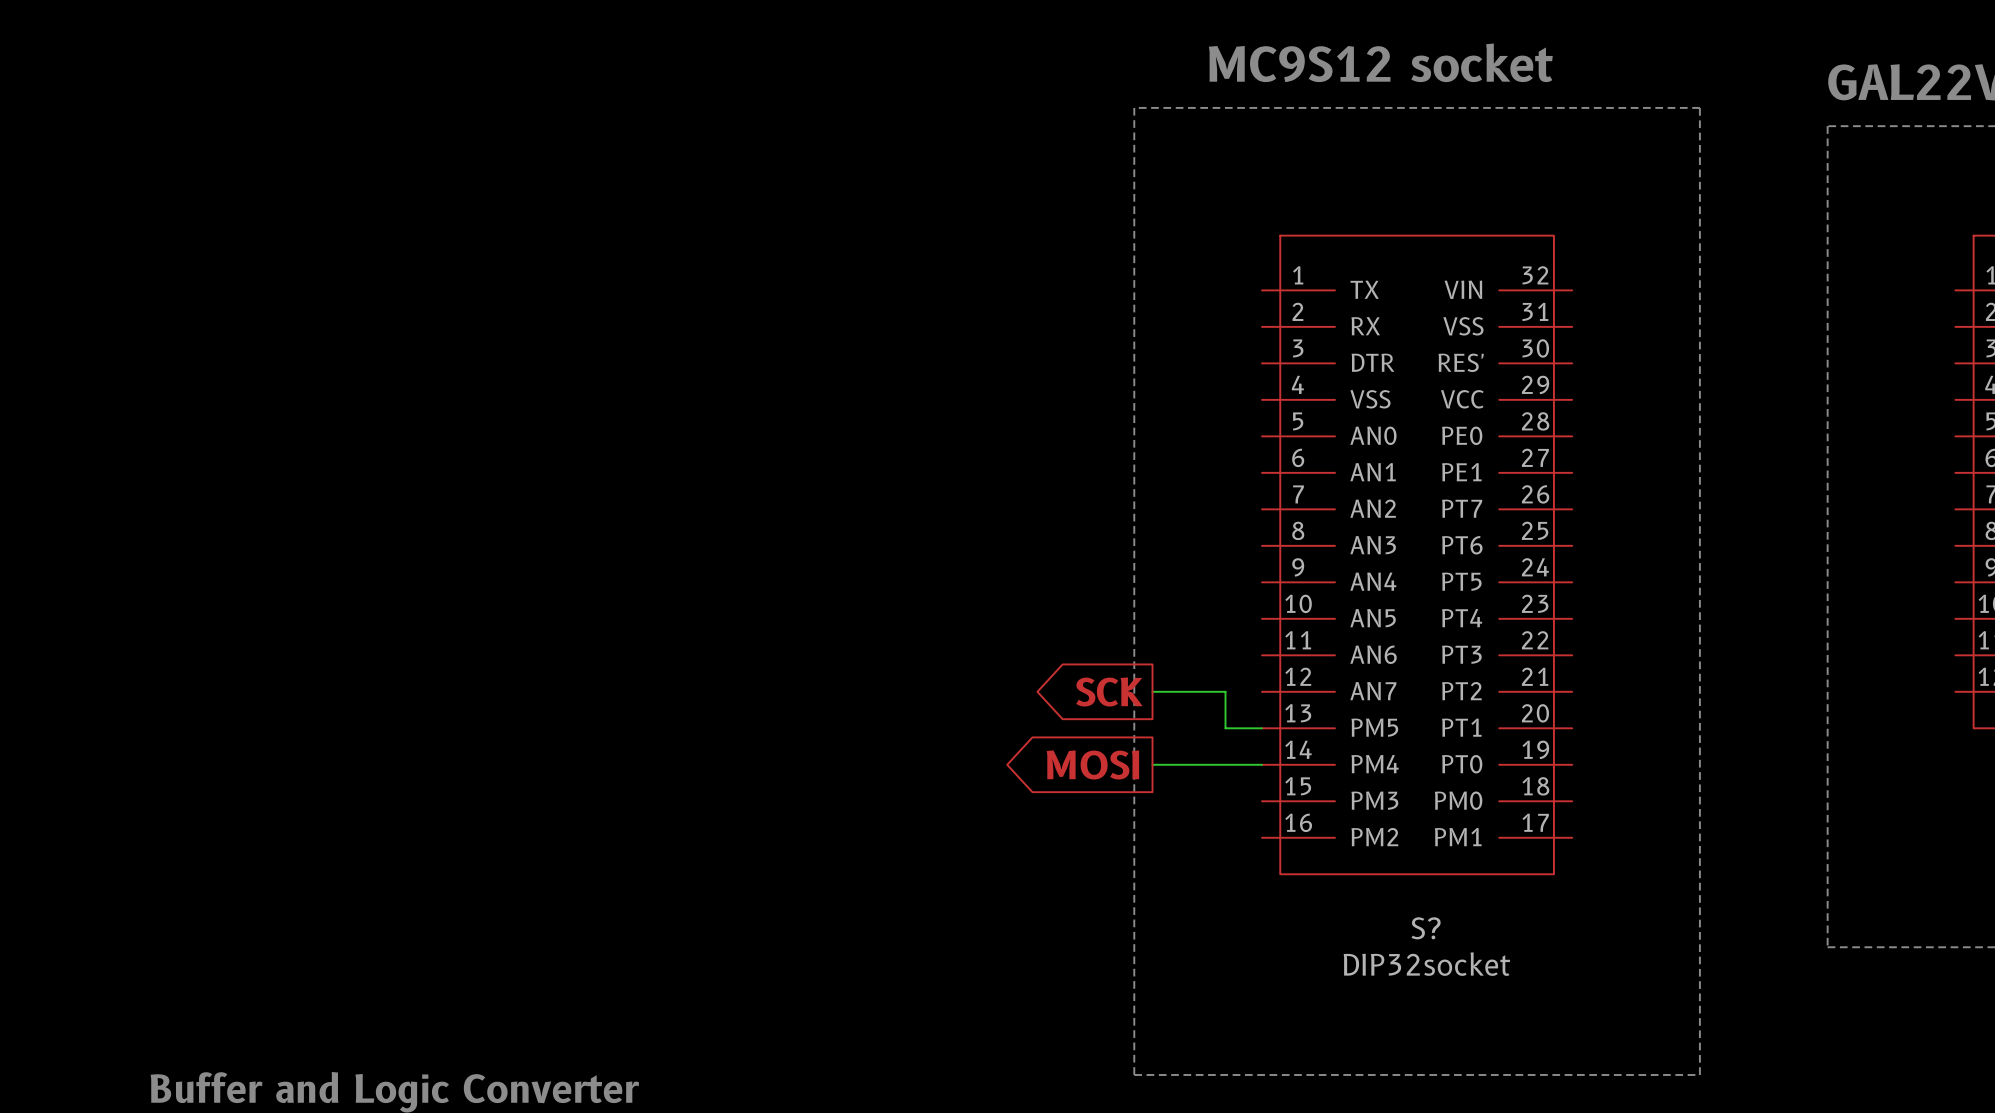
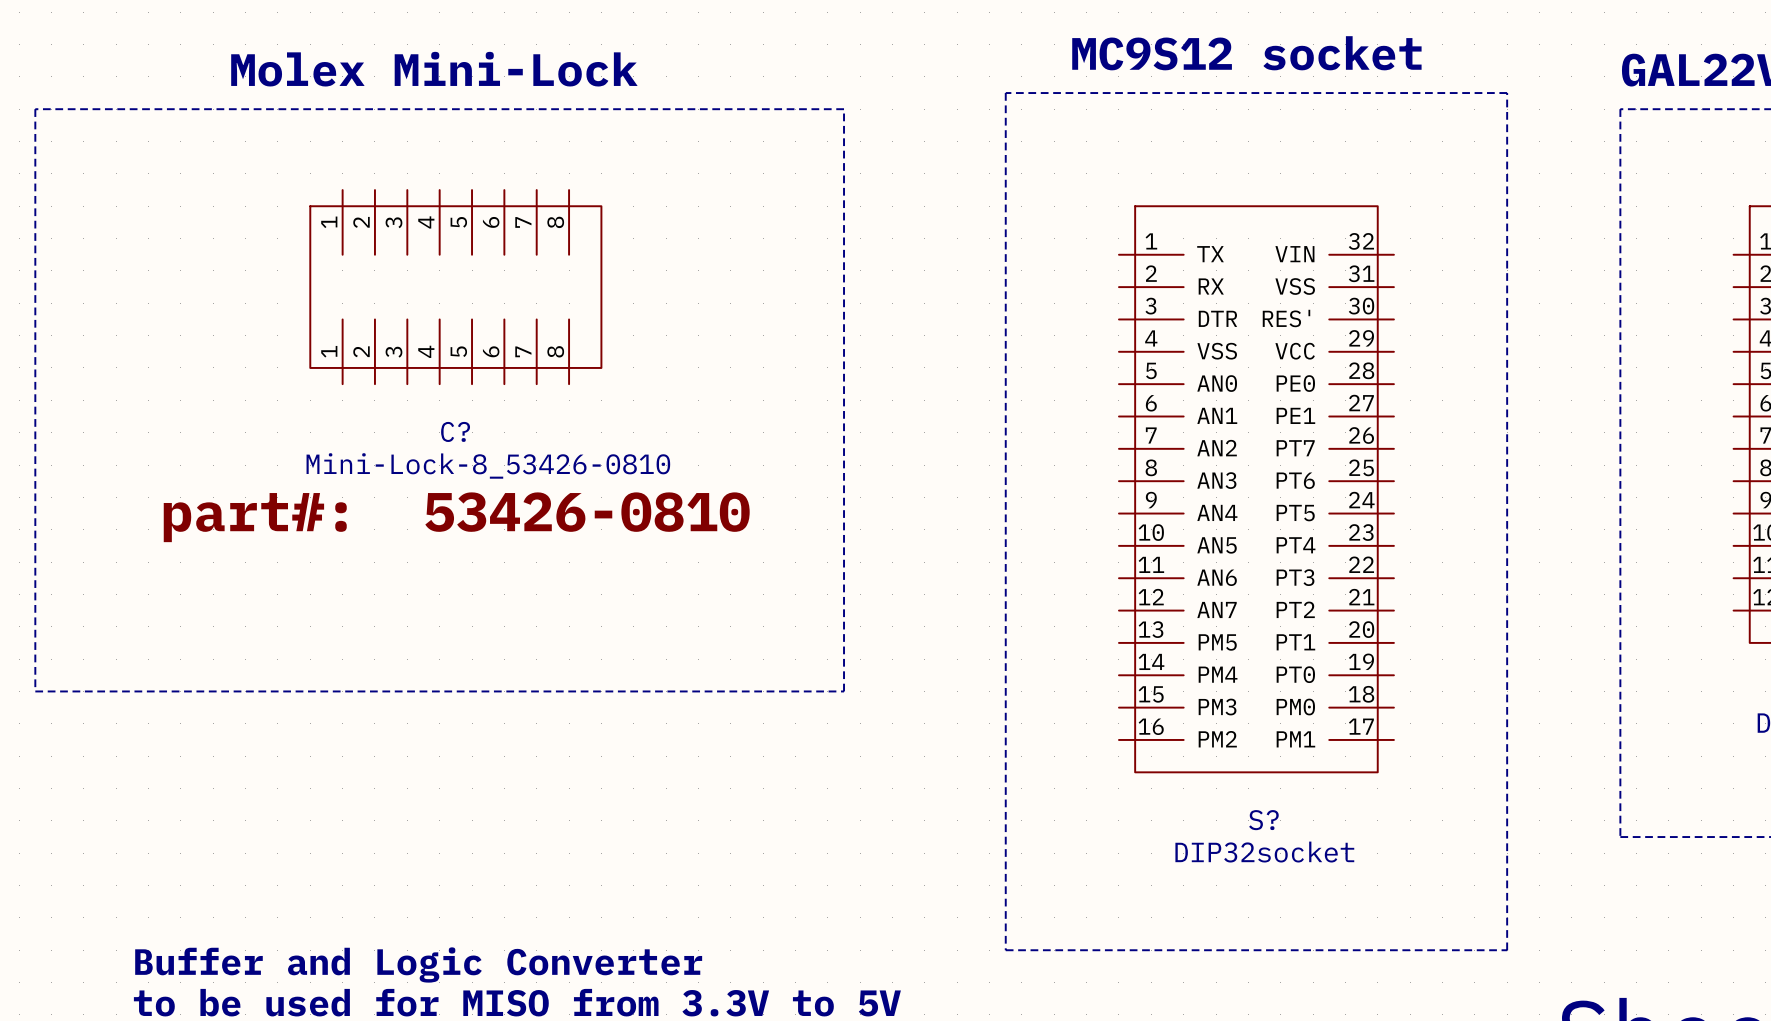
text: none -> Molex Mini-Lock (434, 69)
line: none -> (35, 109) (35, 691) (844, 691) (844, 109) (35, 109)
C?: none -> Mini-Lock-8_53426-0810 (455, 287)
global label: SCK (1109, 691) -> none
wire: (1152, 691) (1225, 691) (1225, 728) (1262, 728) -> none
global label: MOSI (1092, 764) -> none
wire: (1152, 764) (1262, 764) -> none

